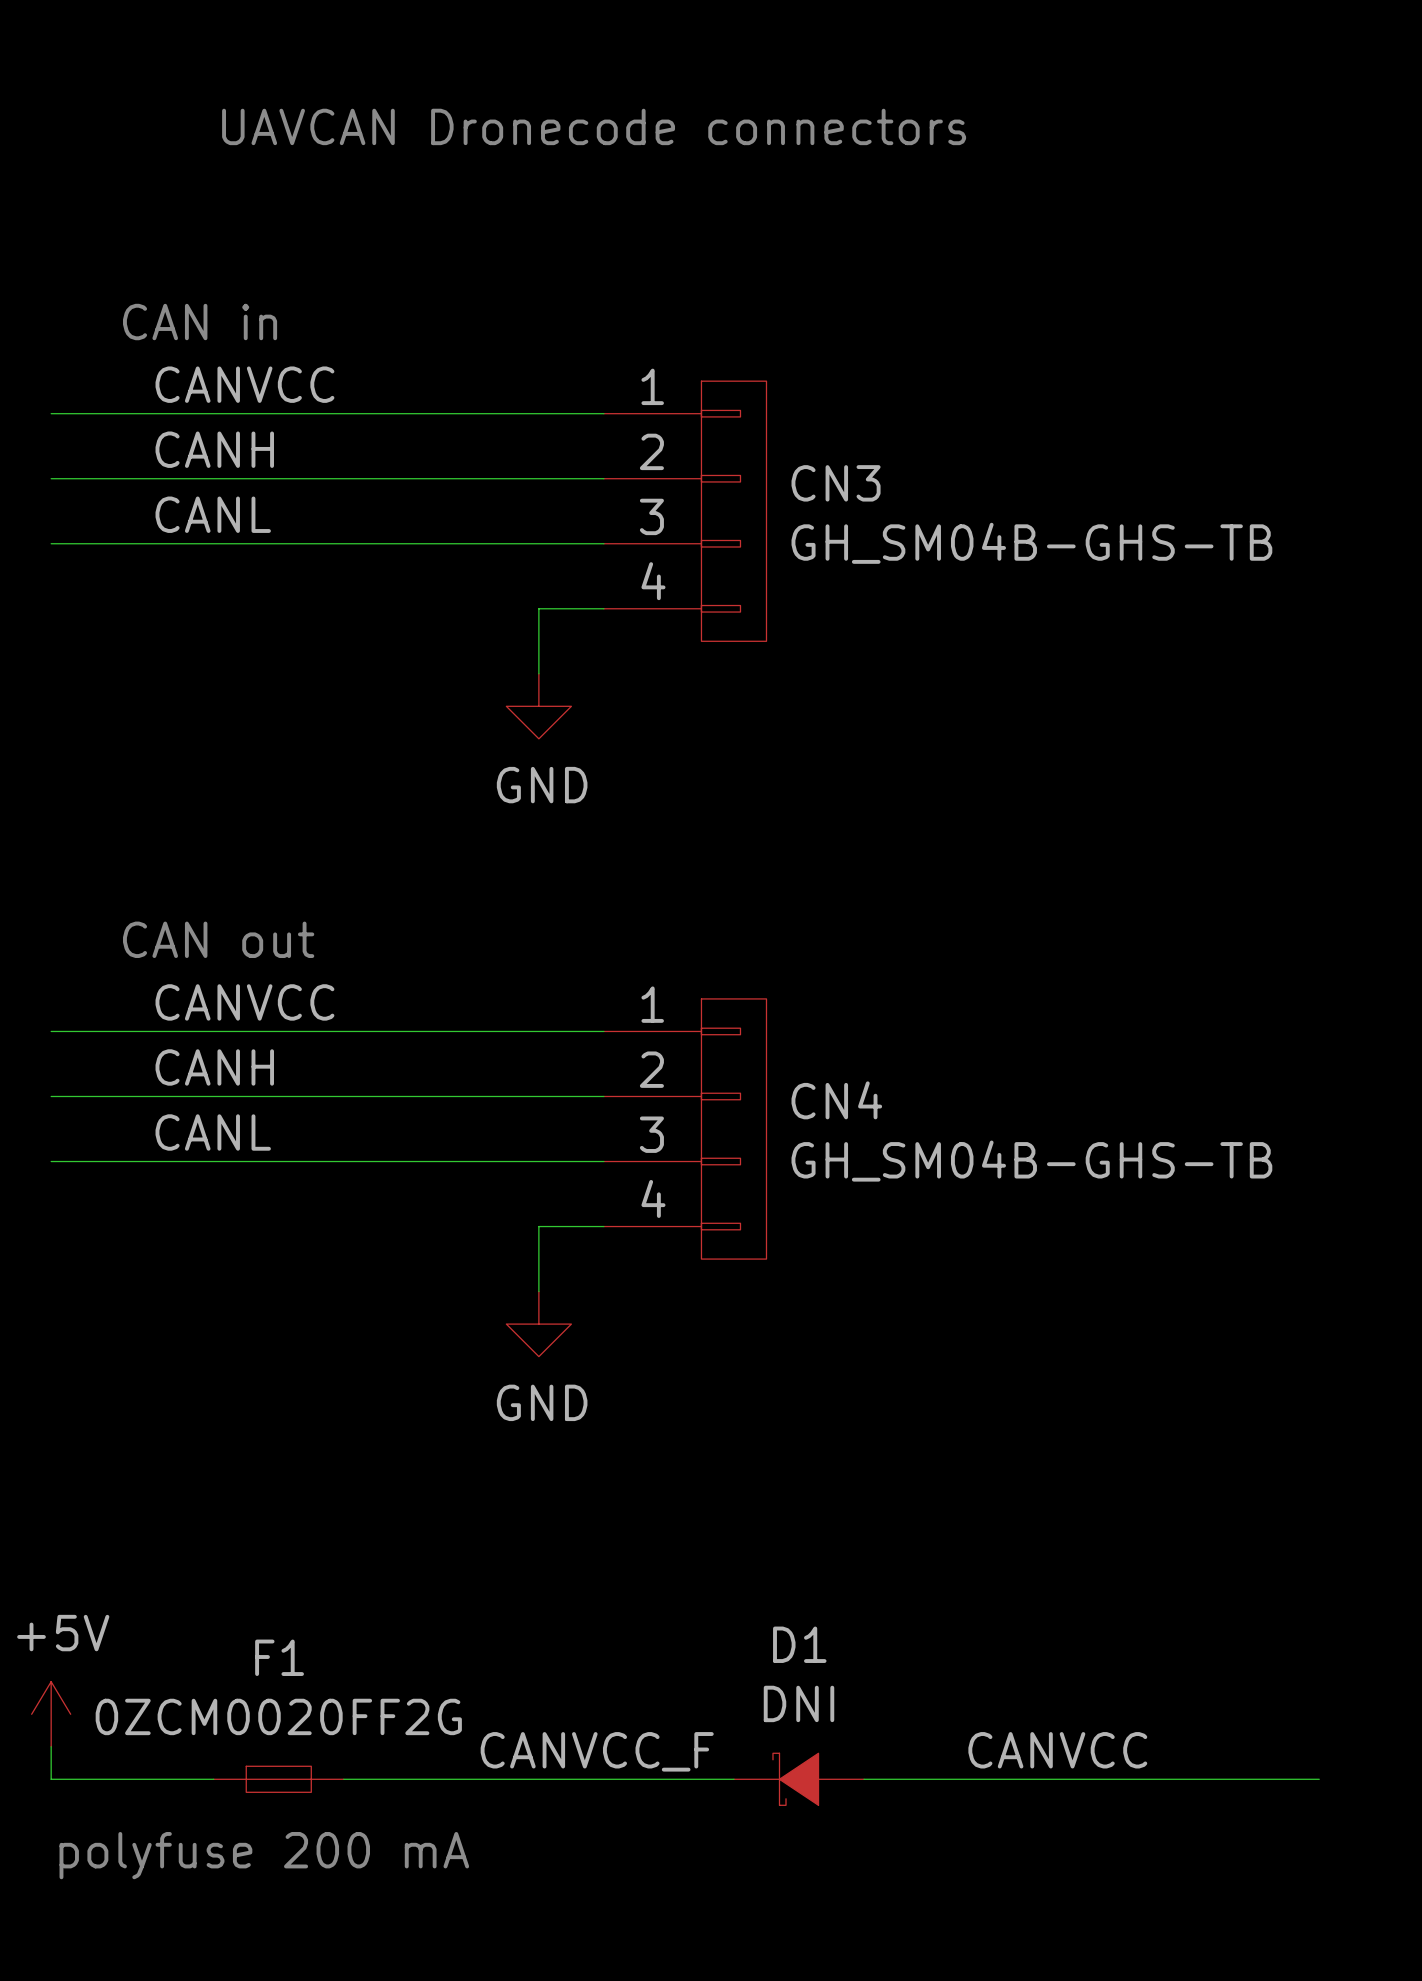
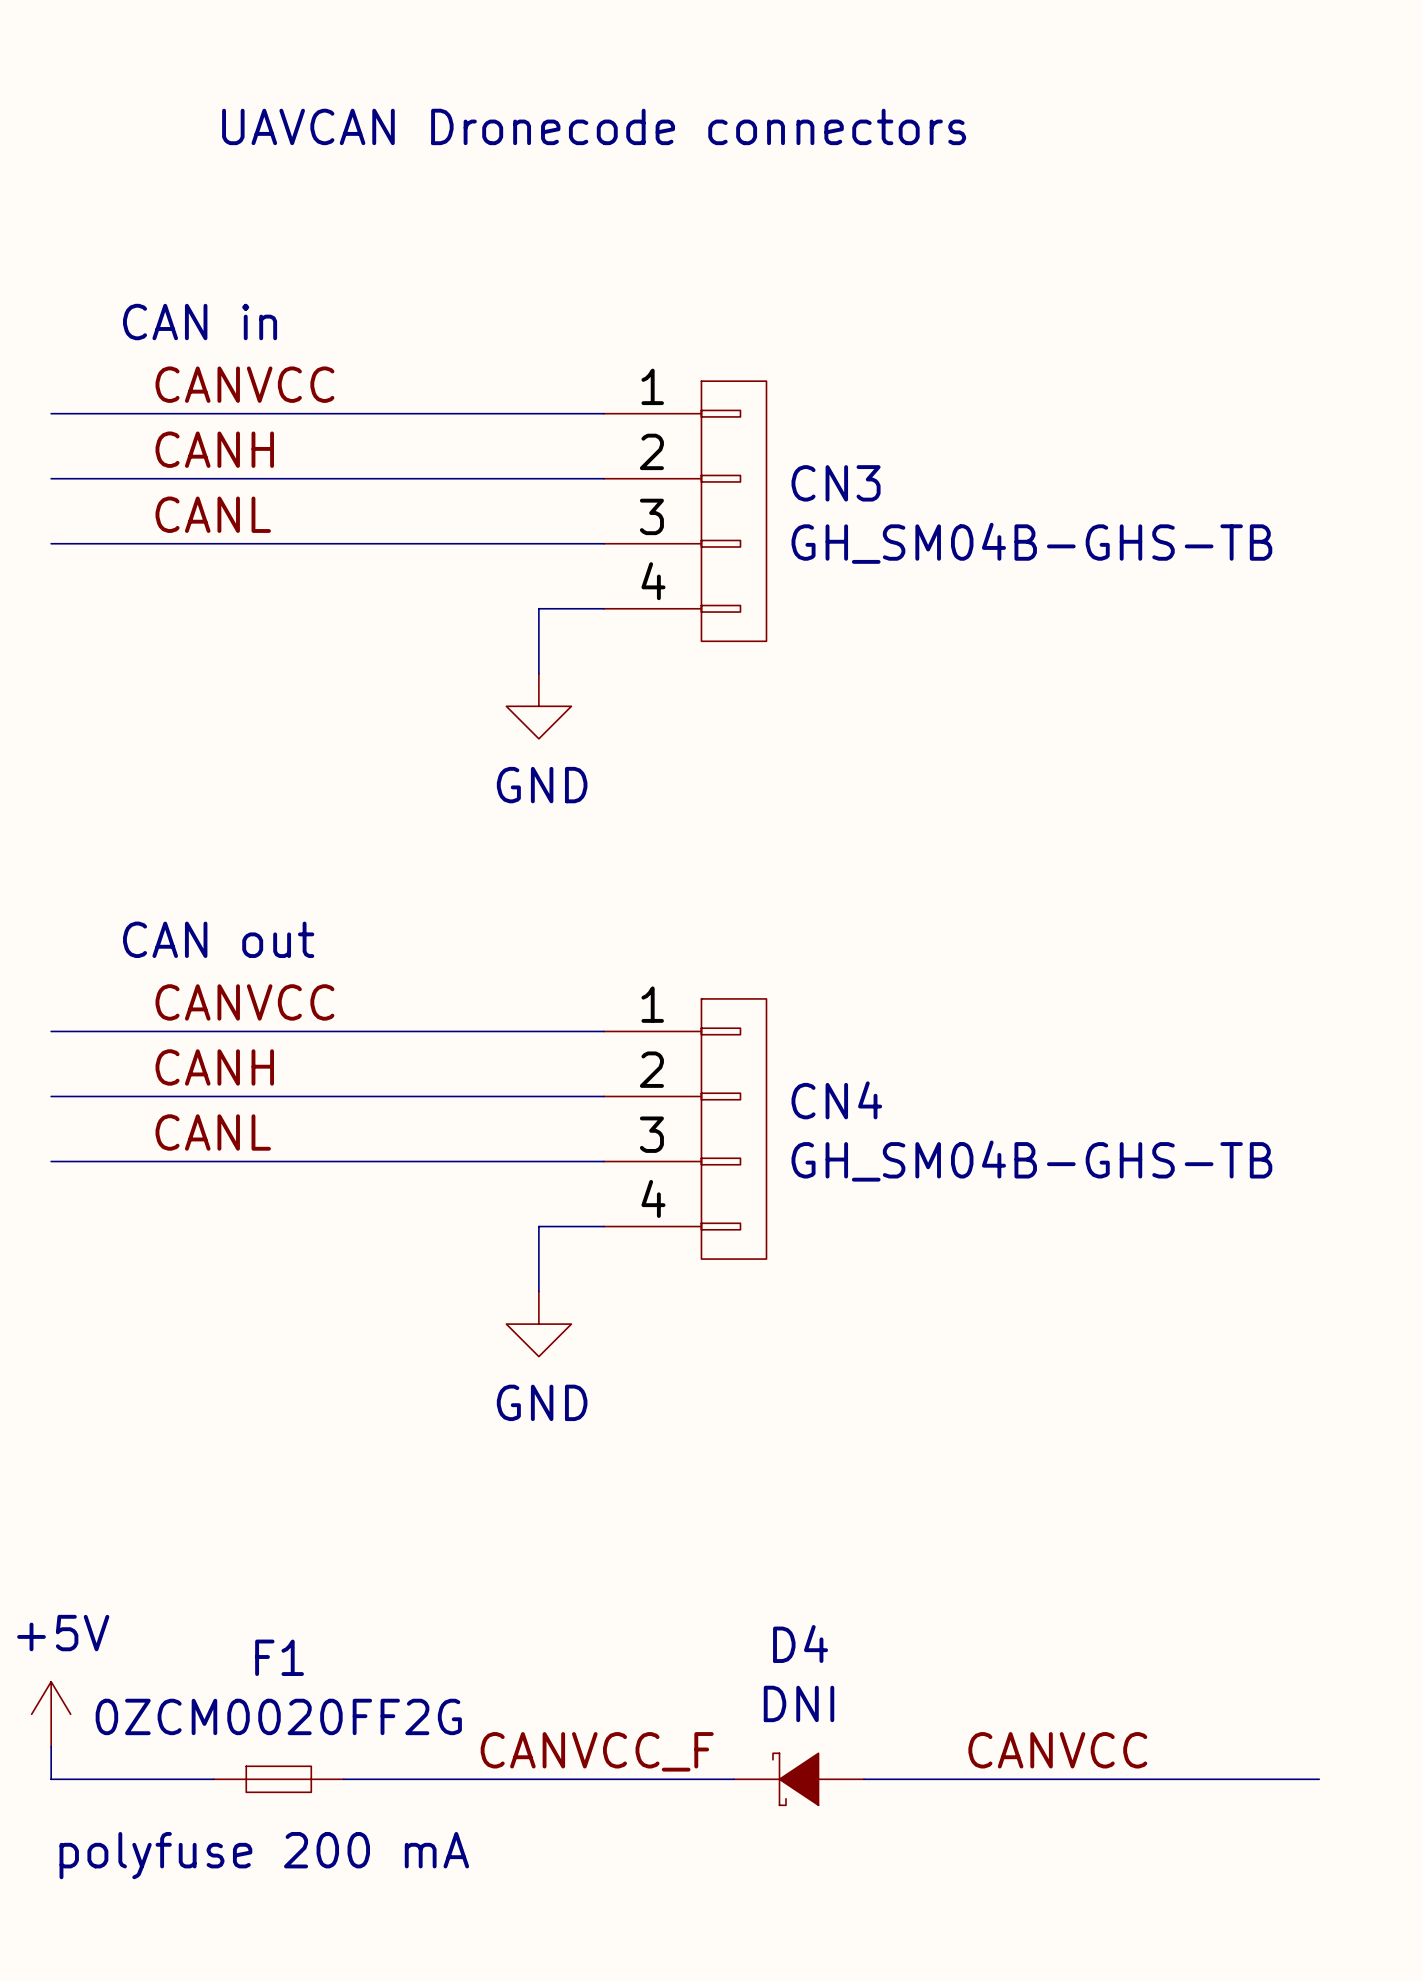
D1 name: D1 (799, 1644) -> D4 (800, 1643)

